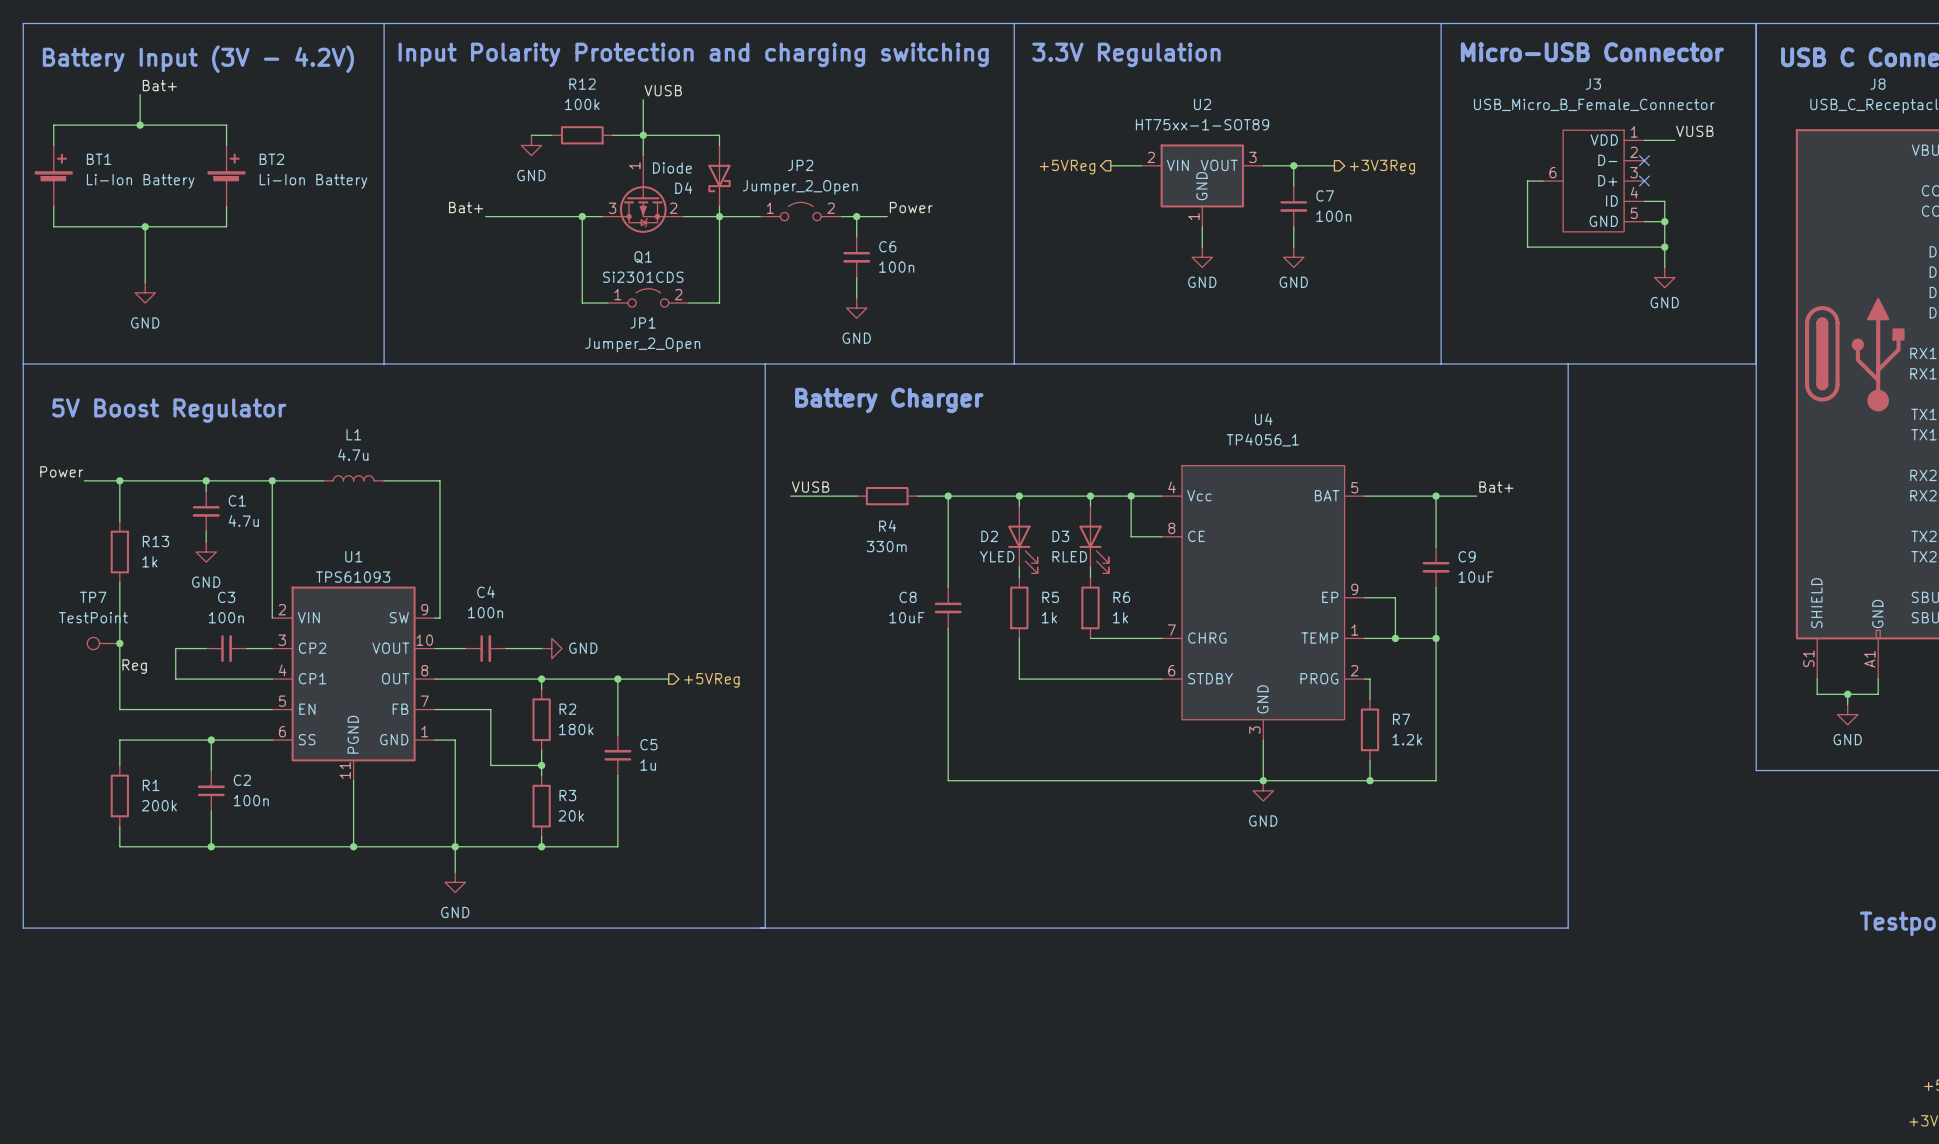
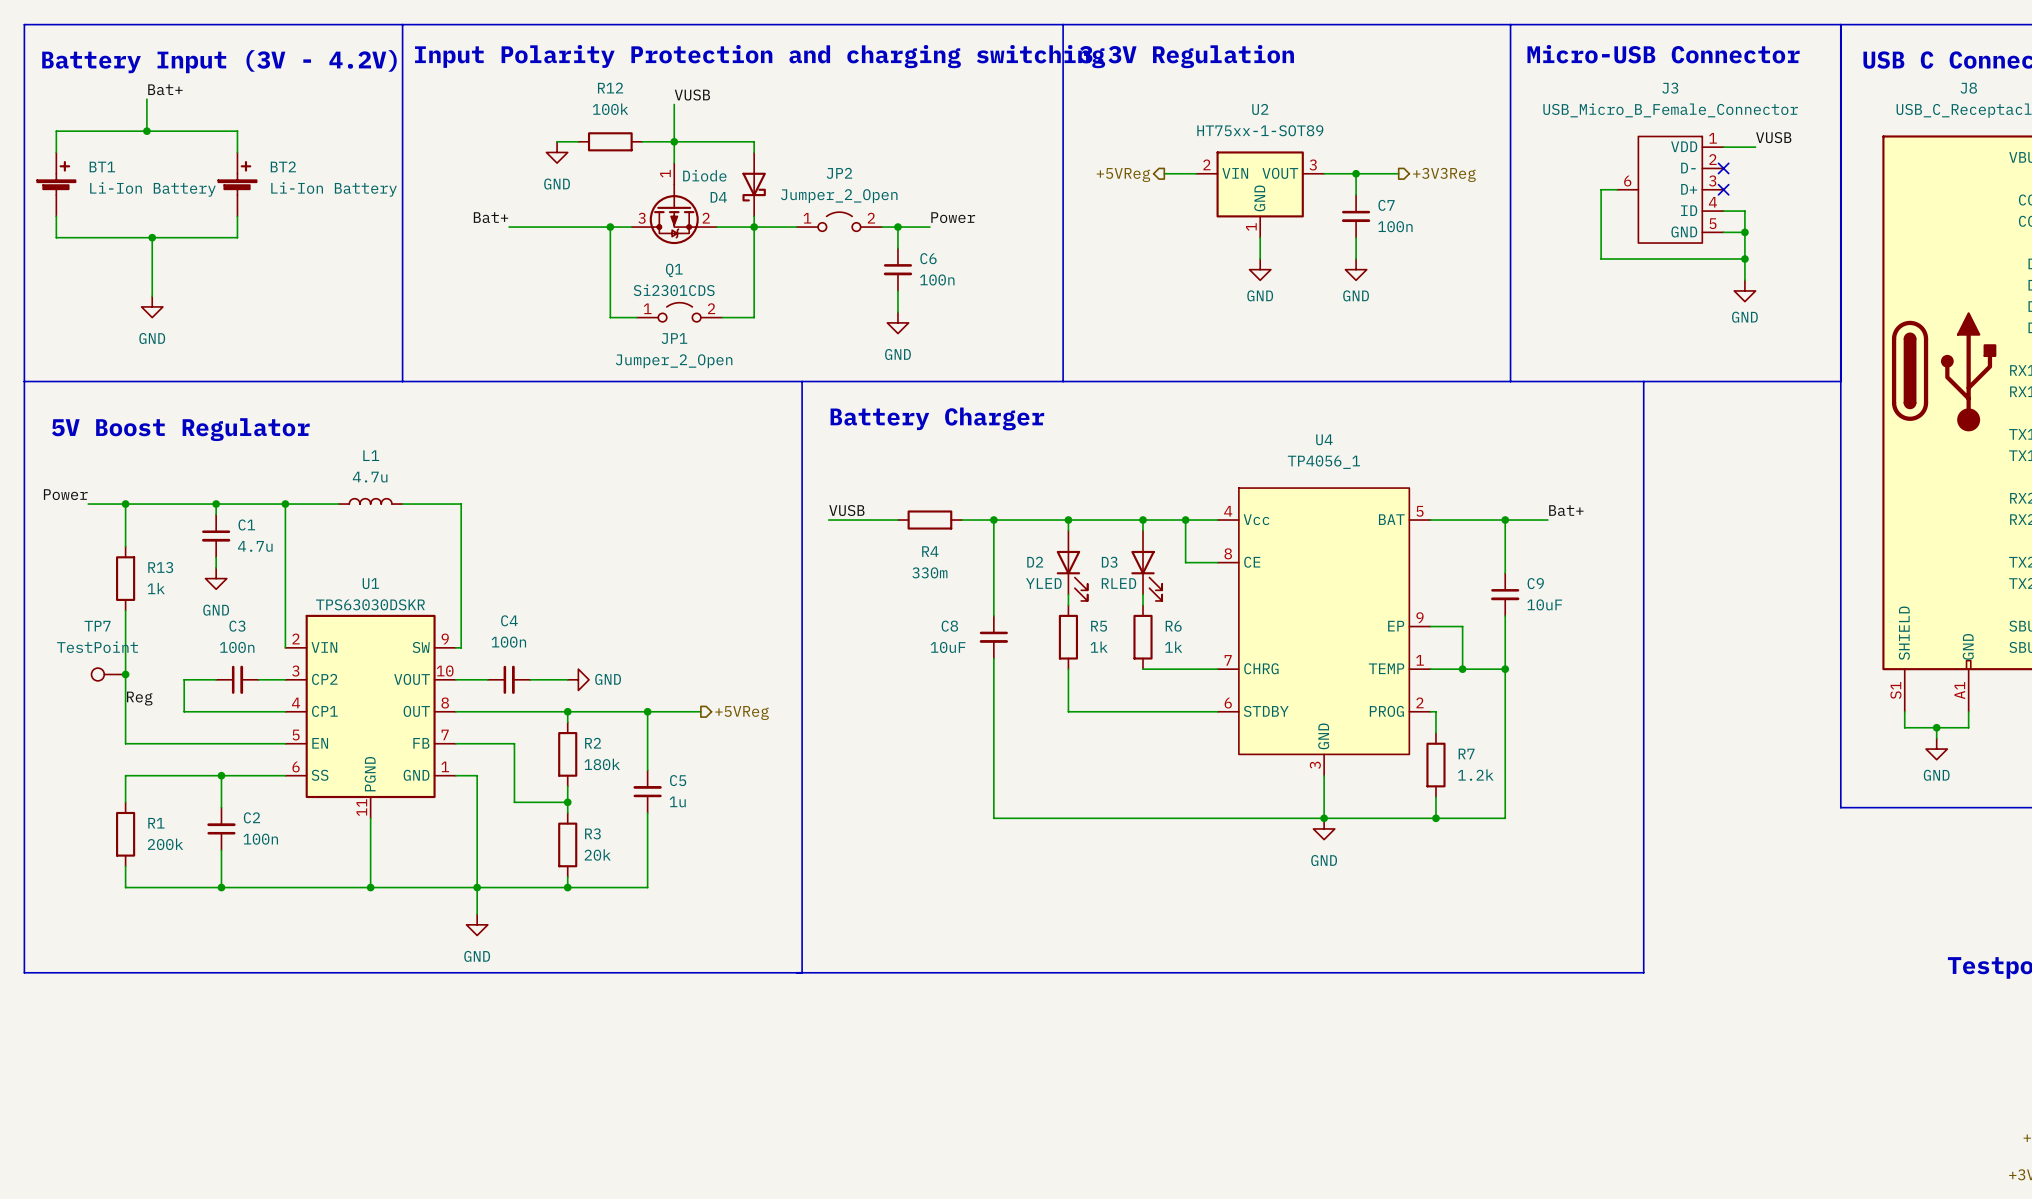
U1 value: TPS61093 (353, 577) -> TPS63030DSKR (370, 604)

